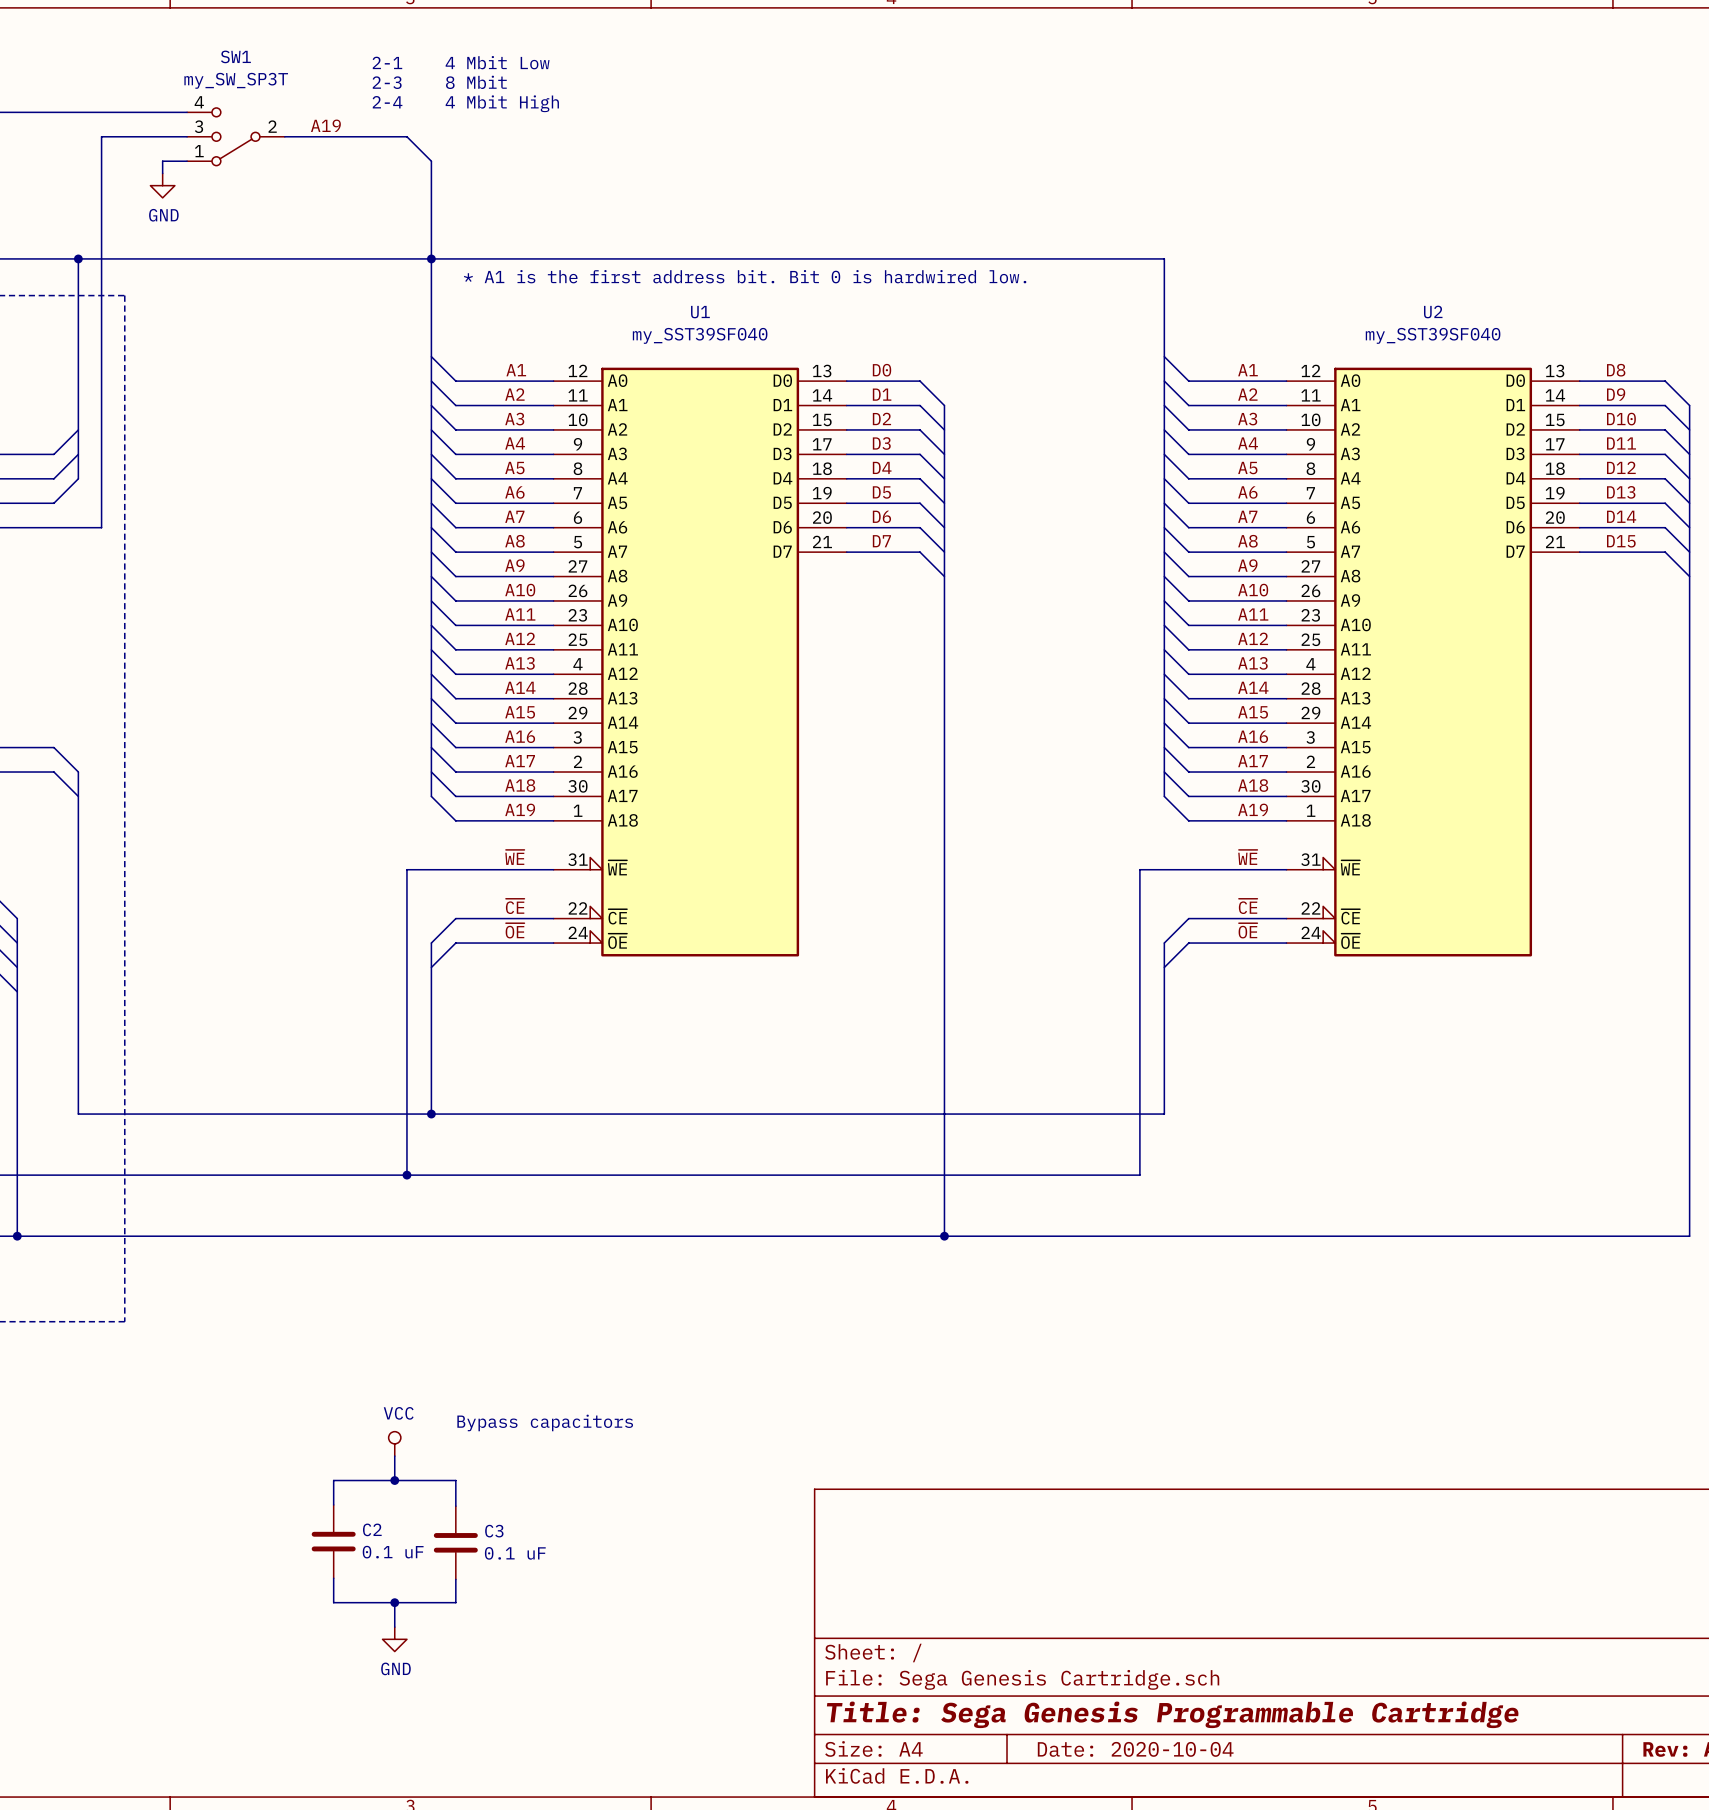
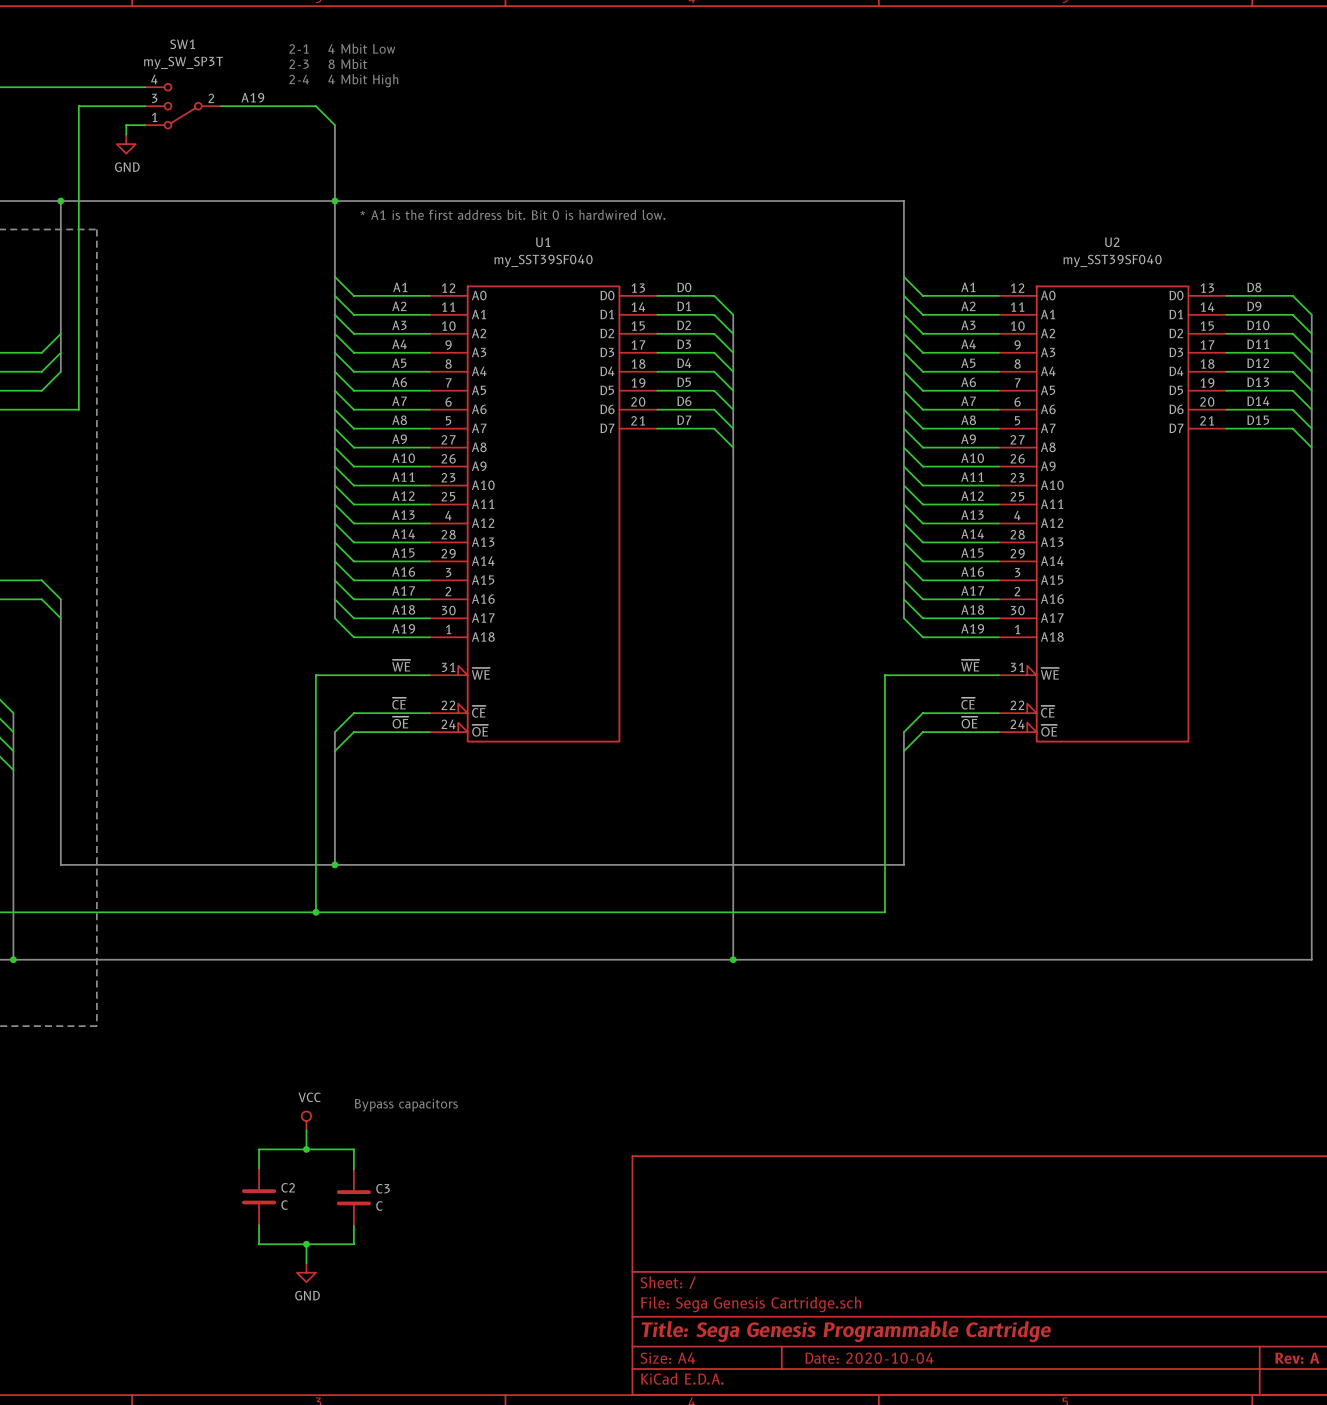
C2 value: 0.1 uF (393, 1552) -> C (284, 1205)
C3 value: 0.1 uF (515, 1553) -> C (379, 1206)

